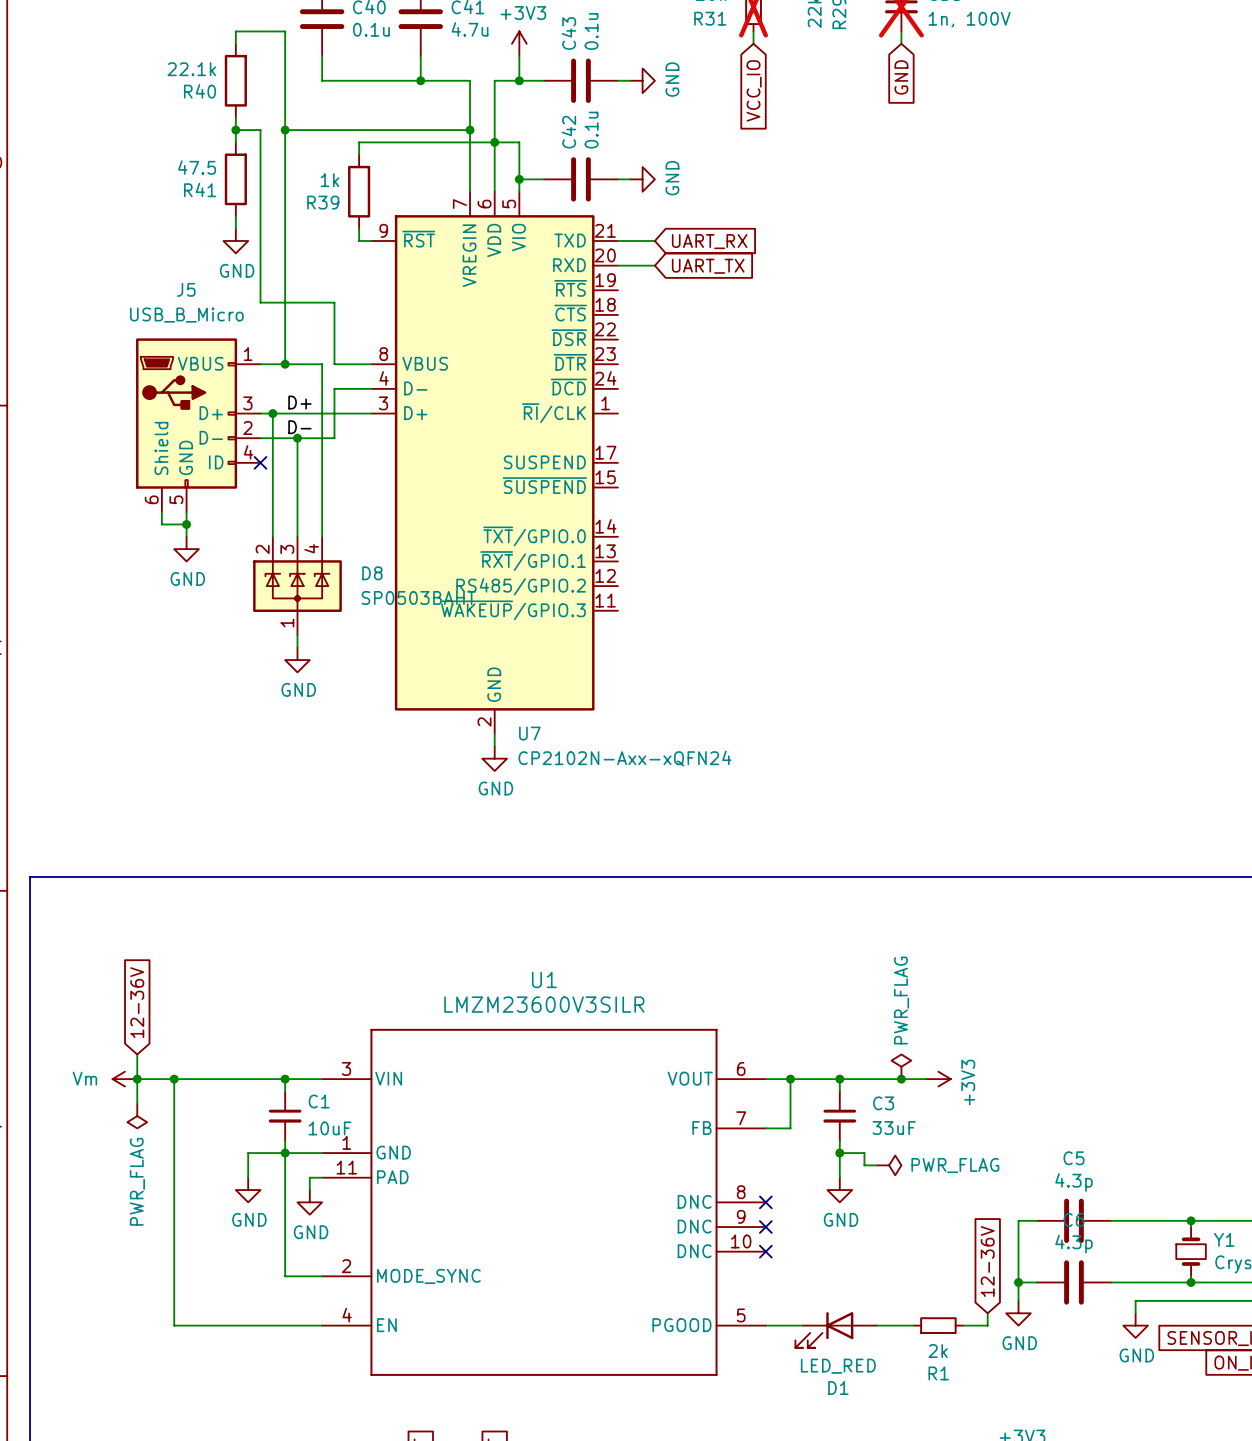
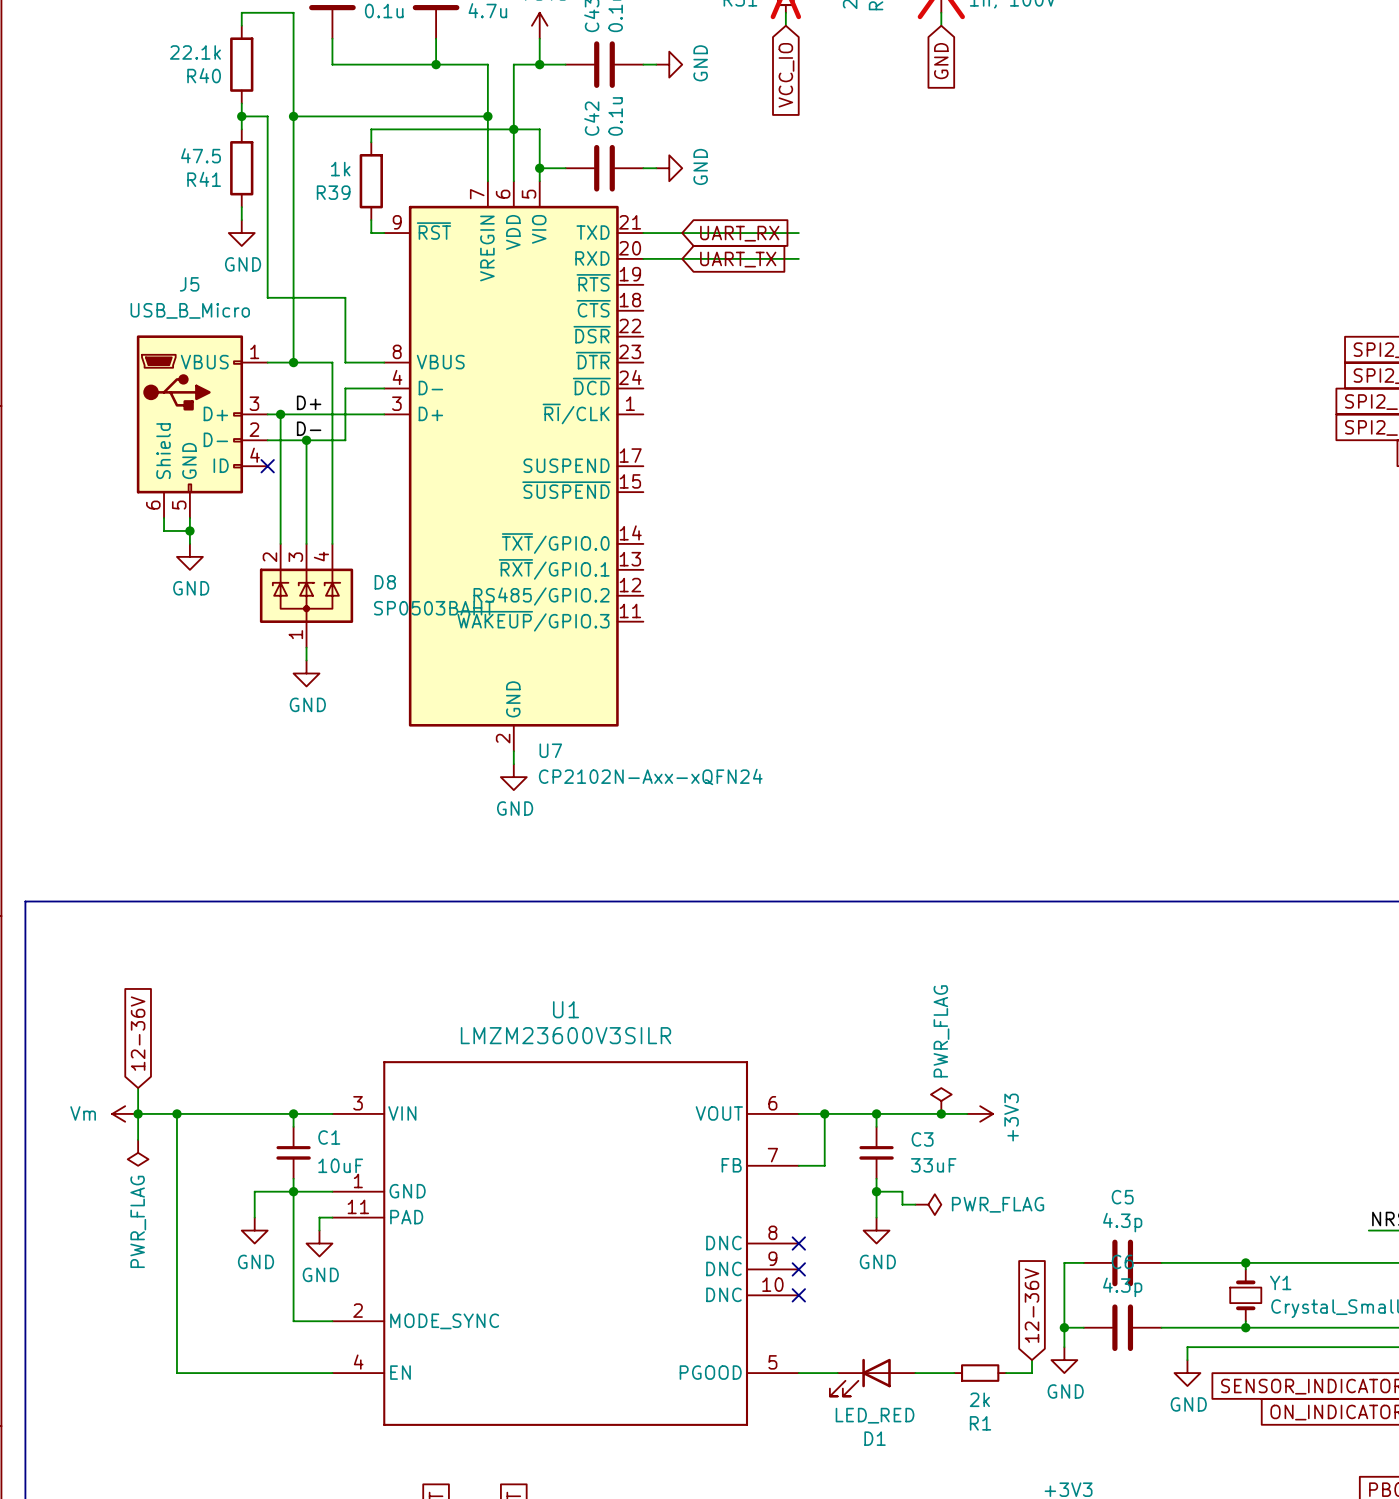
wire: none -> (682, 233) (798, 233)
wire: none -> (682, 258) (798, 258)

